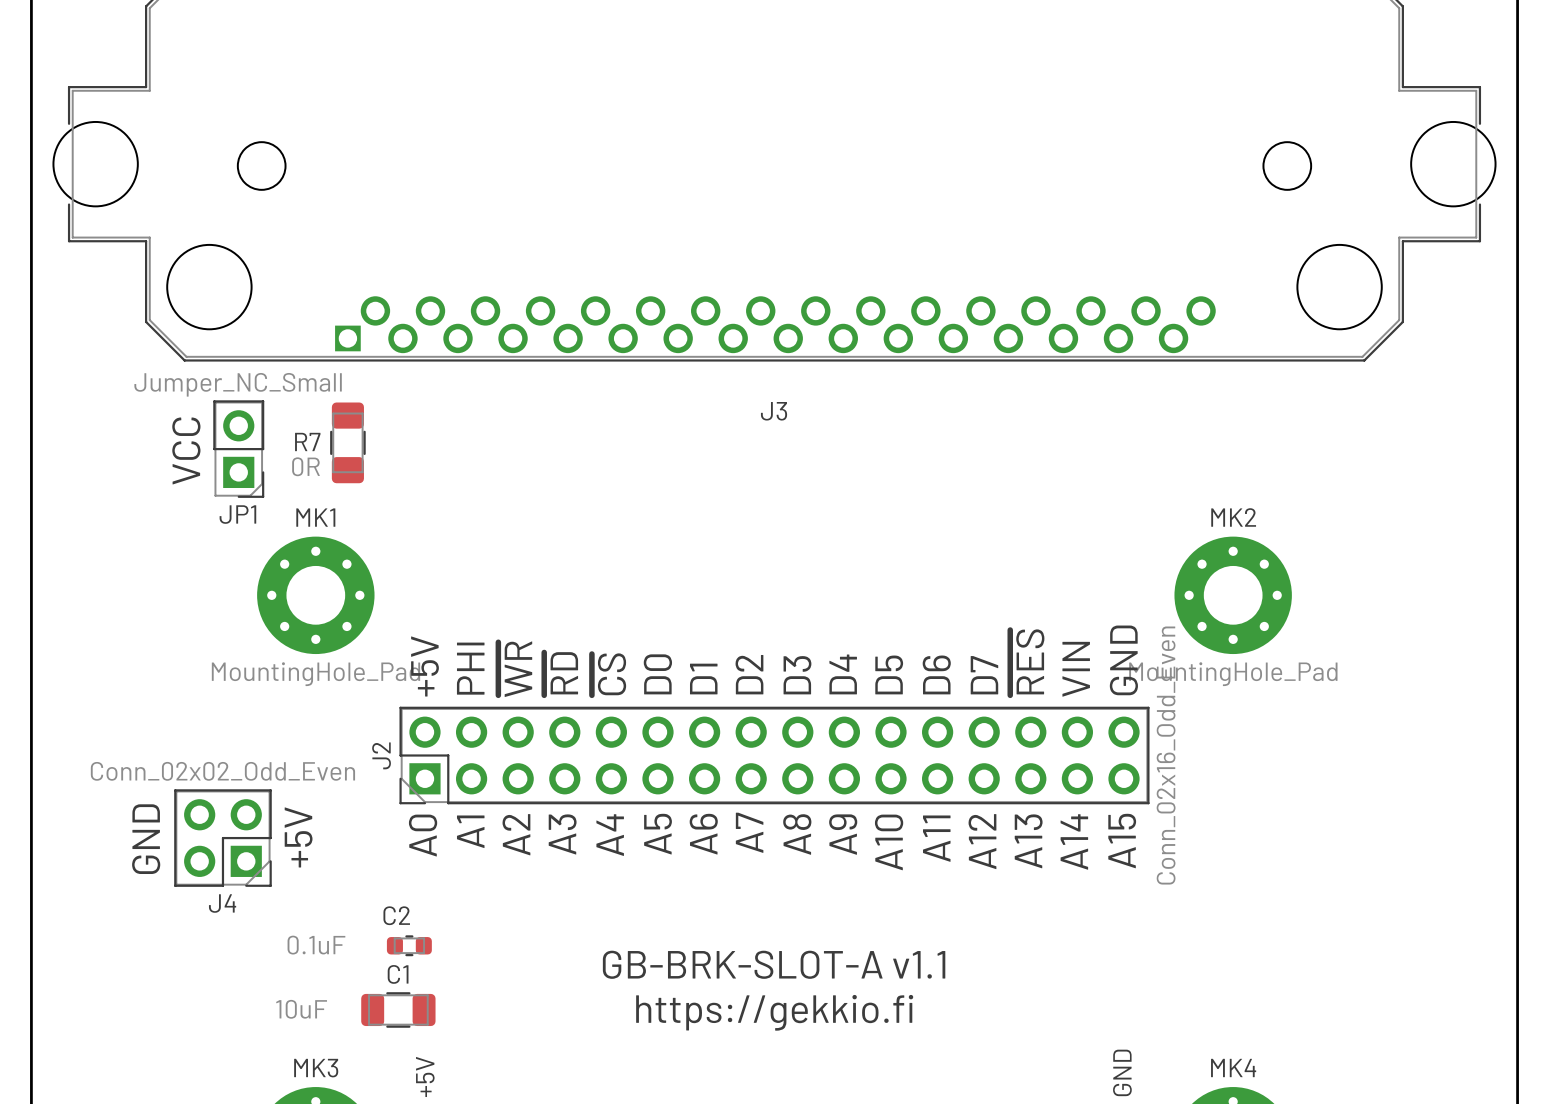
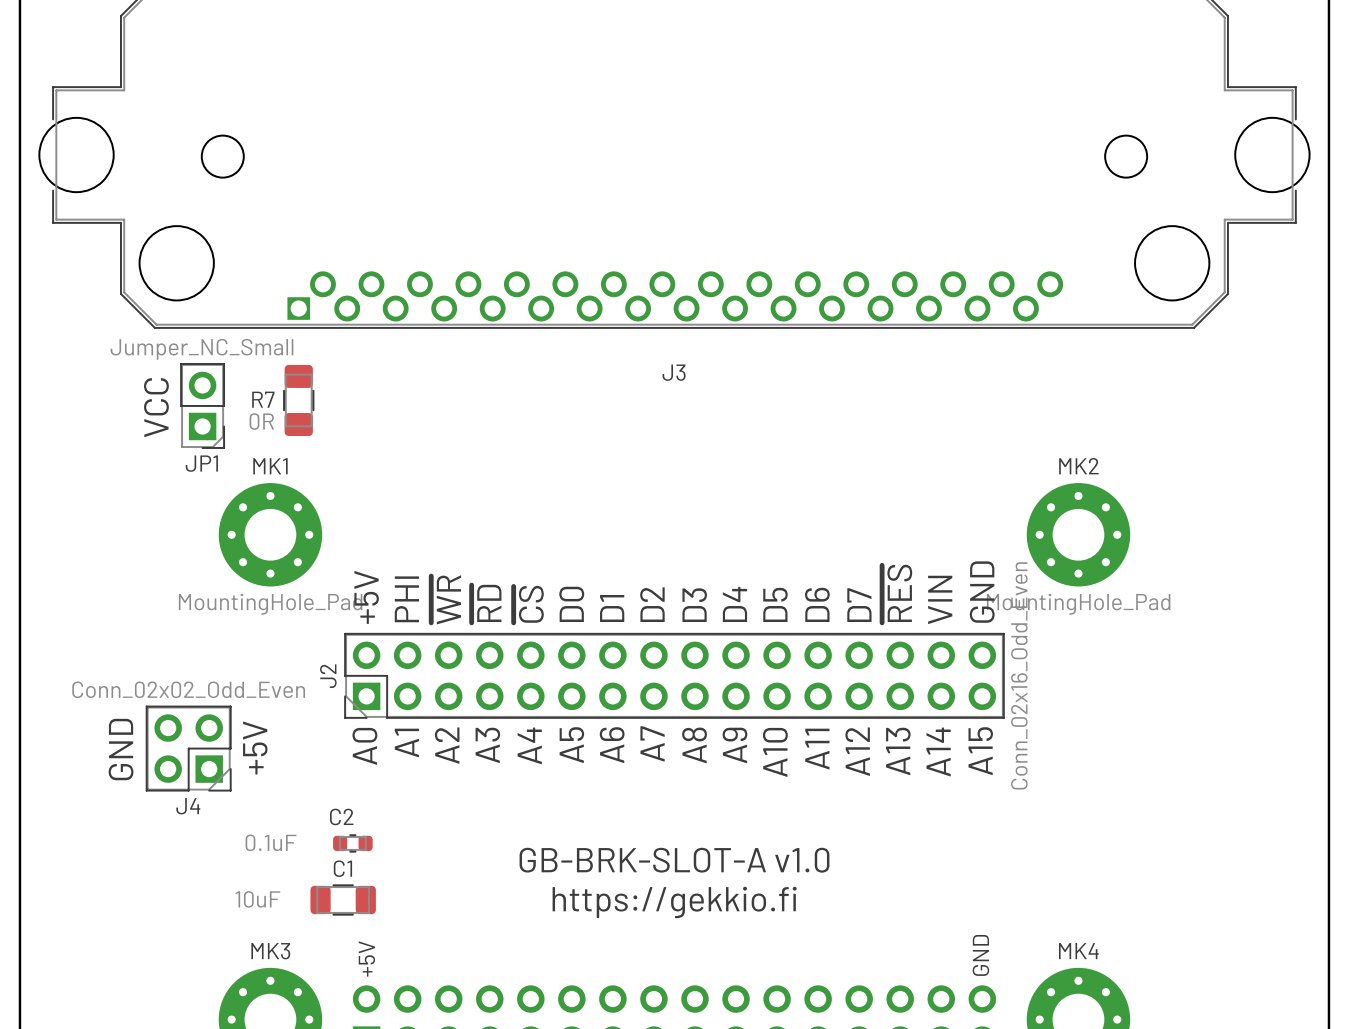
text: GB-BRK-SLOT-A v1.1 (774, 964) -> GB-BRK-SLOT-A v1.0 (674, 860)

